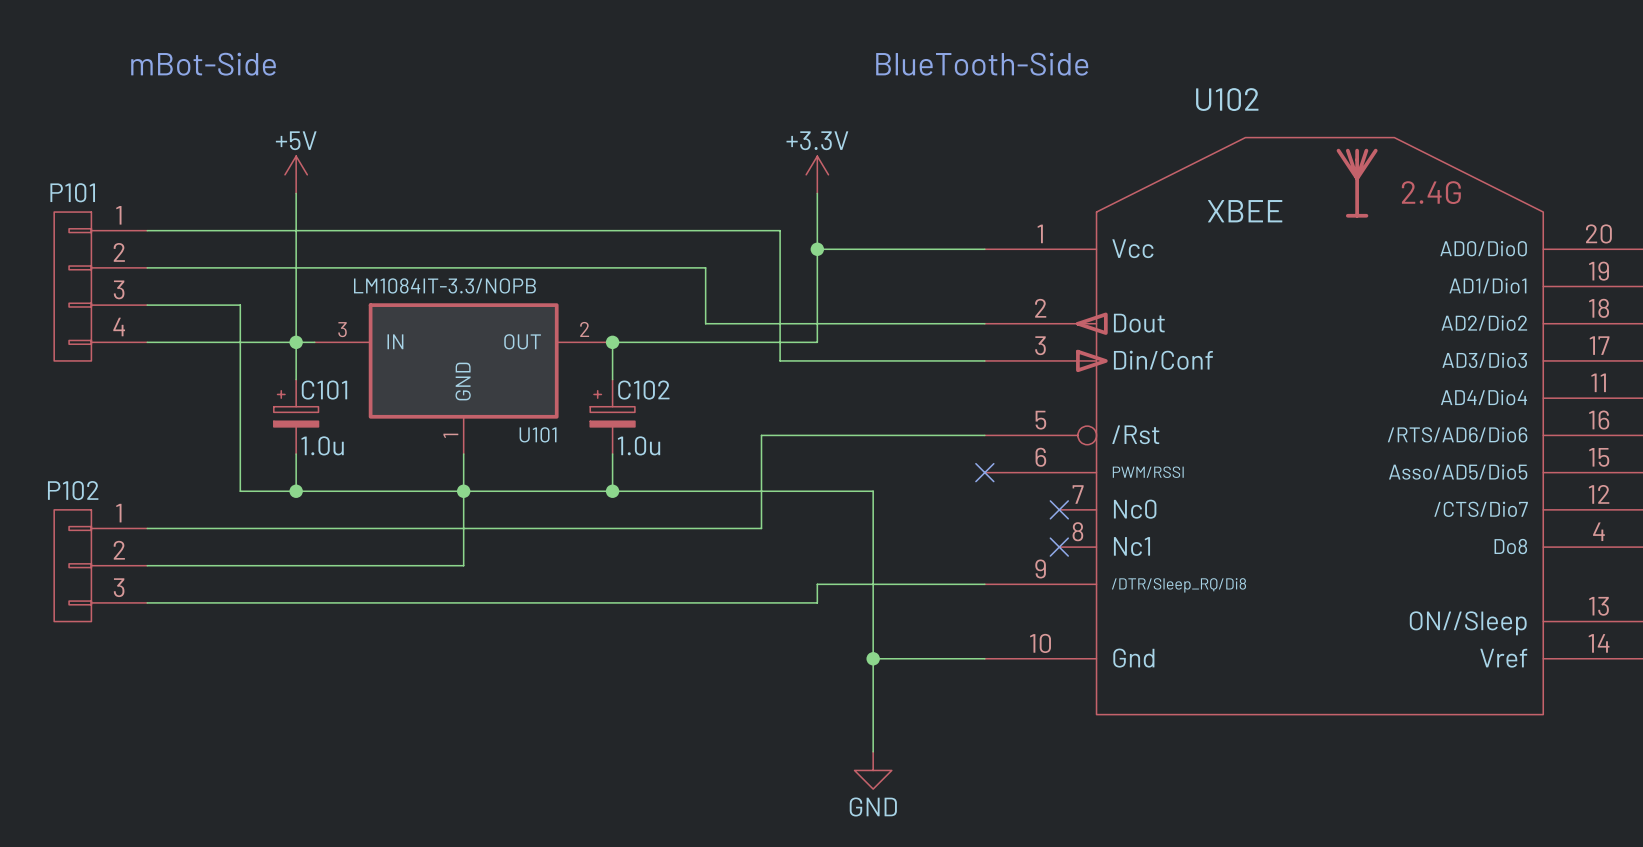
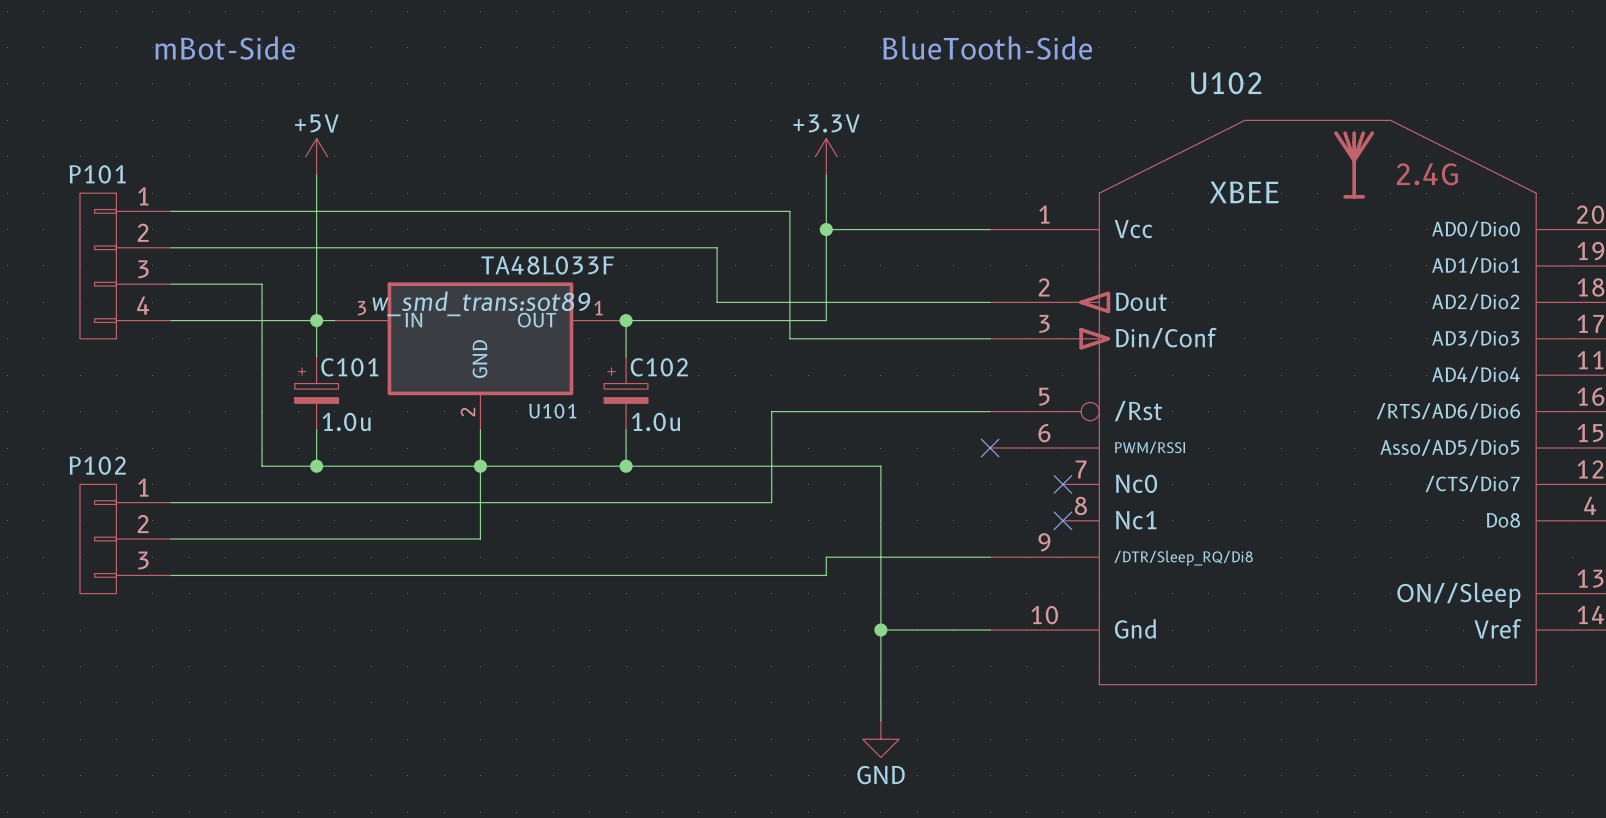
U101 value: LM1084IT-3.3/NOPB (444, 285) -> TA48L033F (547, 265)
U101 text: none -> w_smd_trans:sot89 (481, 303)
U101 pin number: 2 (584, 329) -> 1 (598, 308)
U101 pin number: 1 (450, 435) -> 2 (467, 412)

